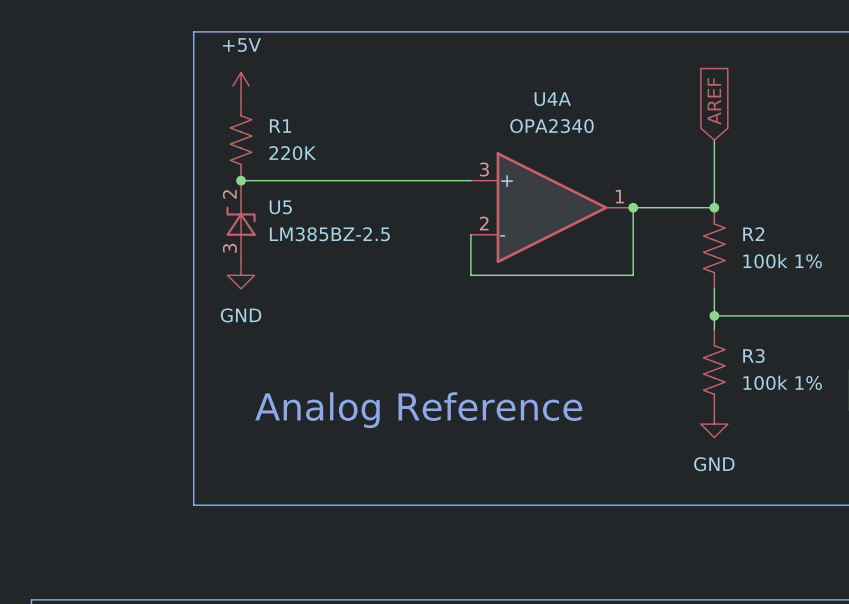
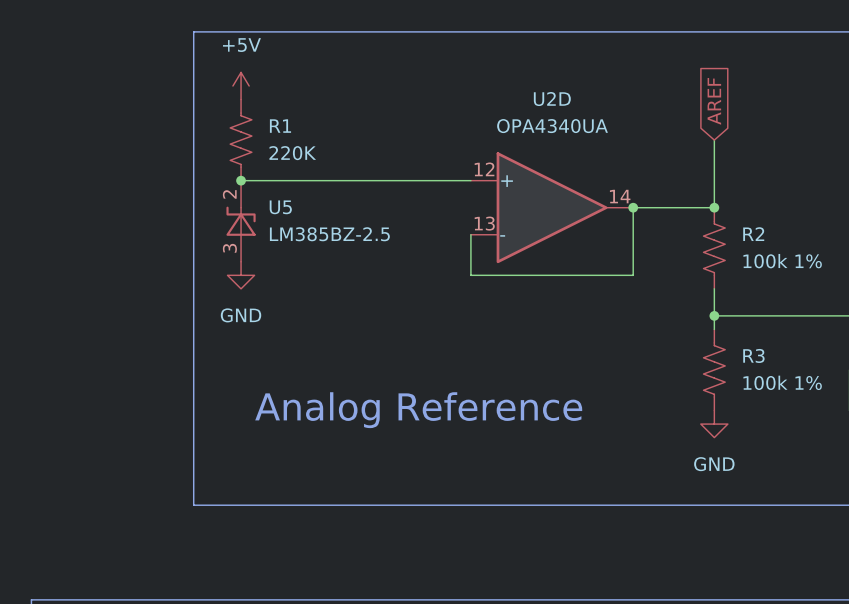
U4A name: U4A (552, 99) -> U2D (552, 99)
U4A value: OPA2340 (551, 126) -> OPA4340UA (552, 126)
U4A pin number: 3 (484, 169) -> 12 (484, 169)
U4A pin number: 1 (619, 196) -> 14 (620, 196)
U4A pin number: 2 (484, 223) -> 13 (484, 223)

